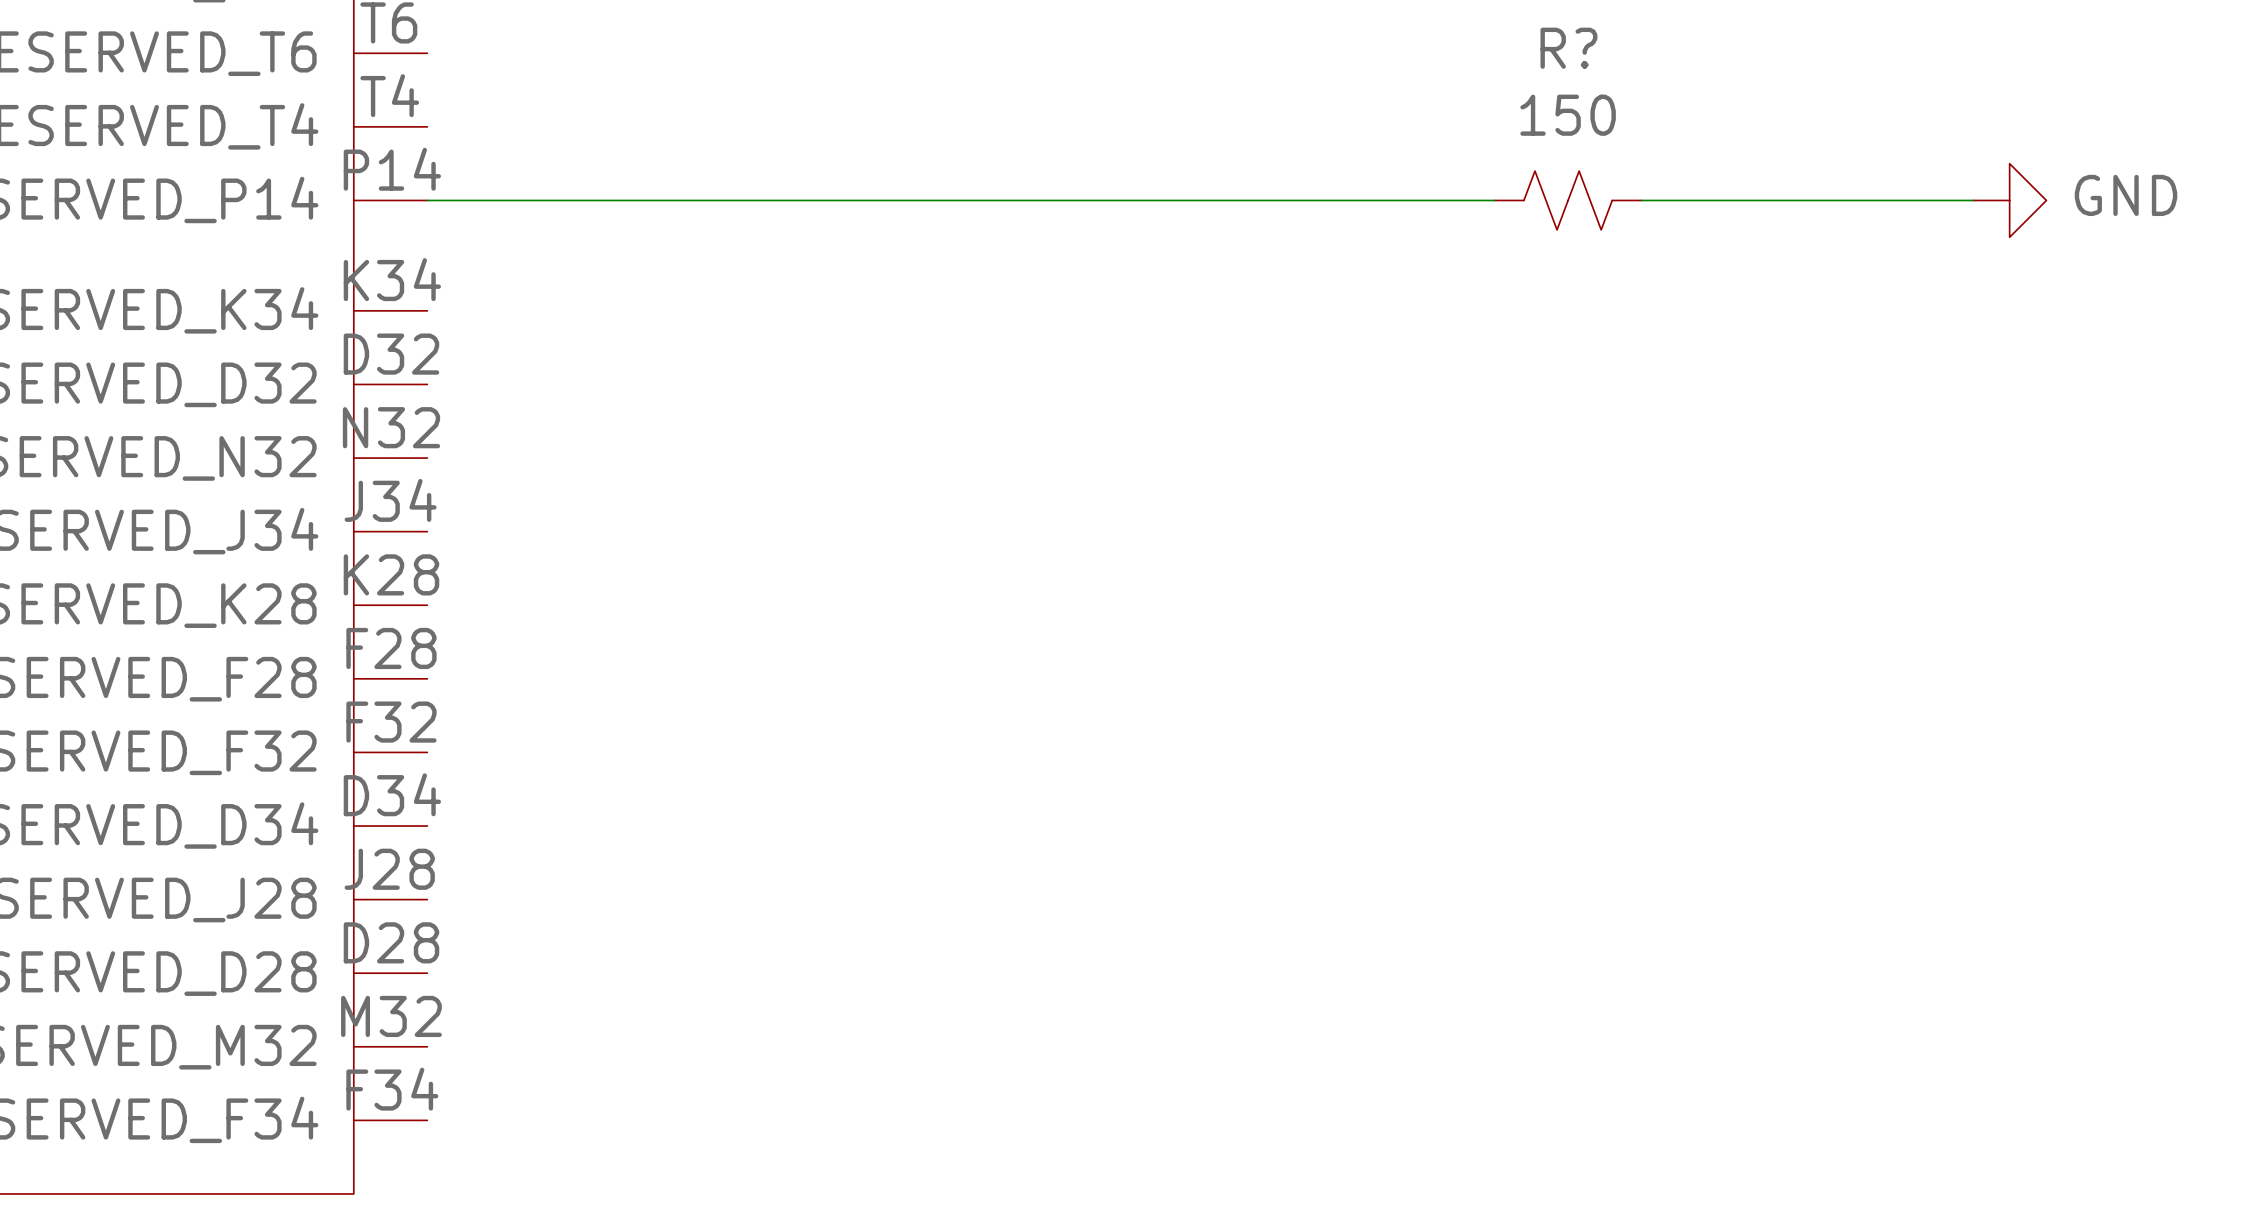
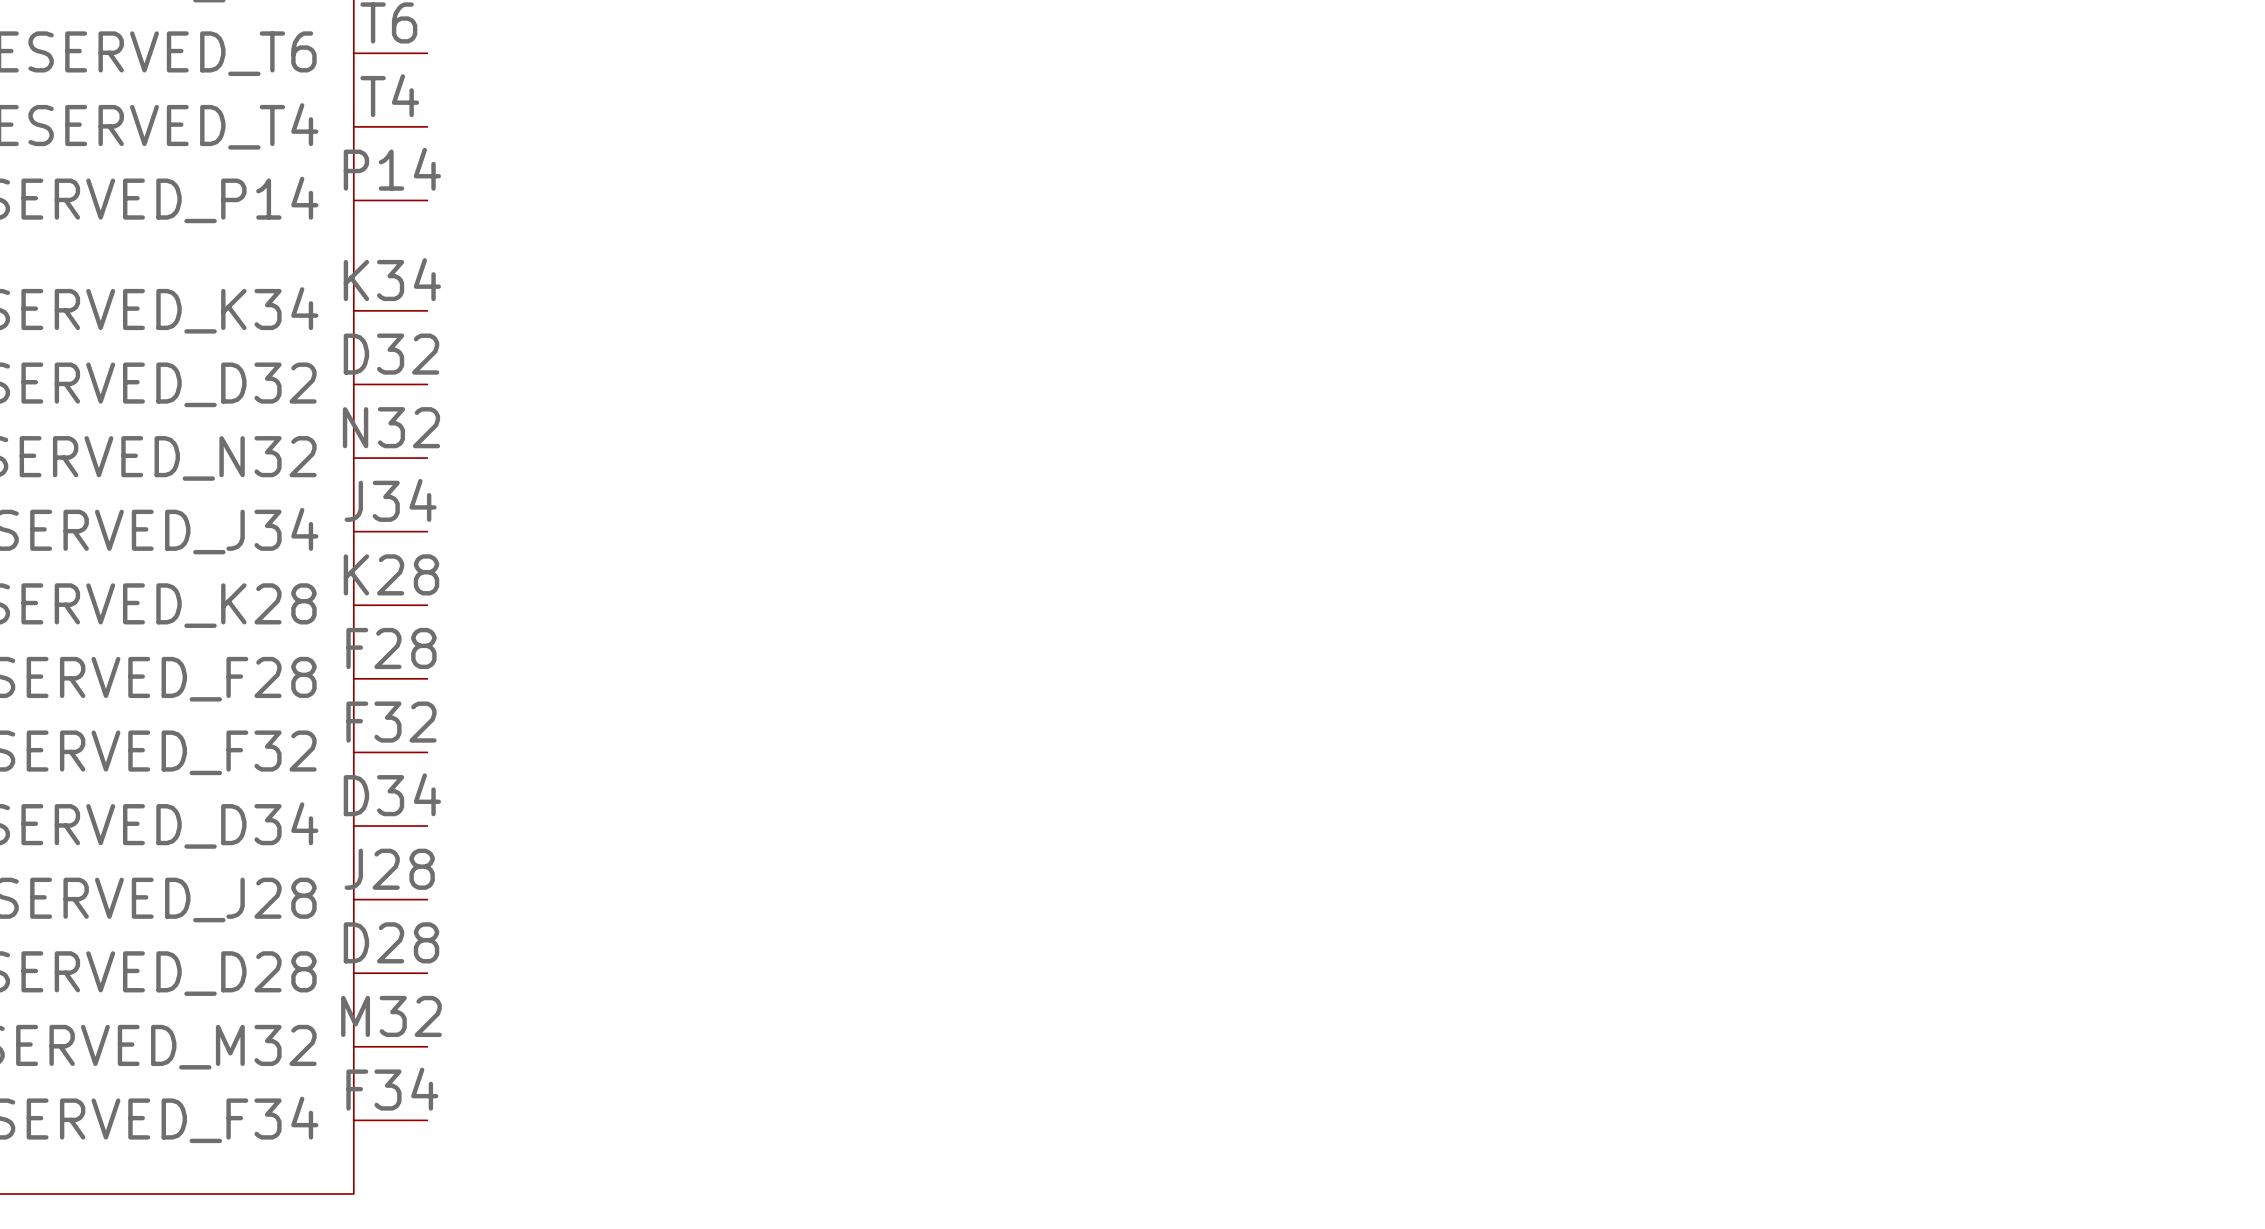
wire: (427, 200) (1494, 200) -> none
R?: 150 (1568, 200) -> none
wire: (1641, 200) (1972, 200) -> none
power symbol: GND (2009, 200) -> none

